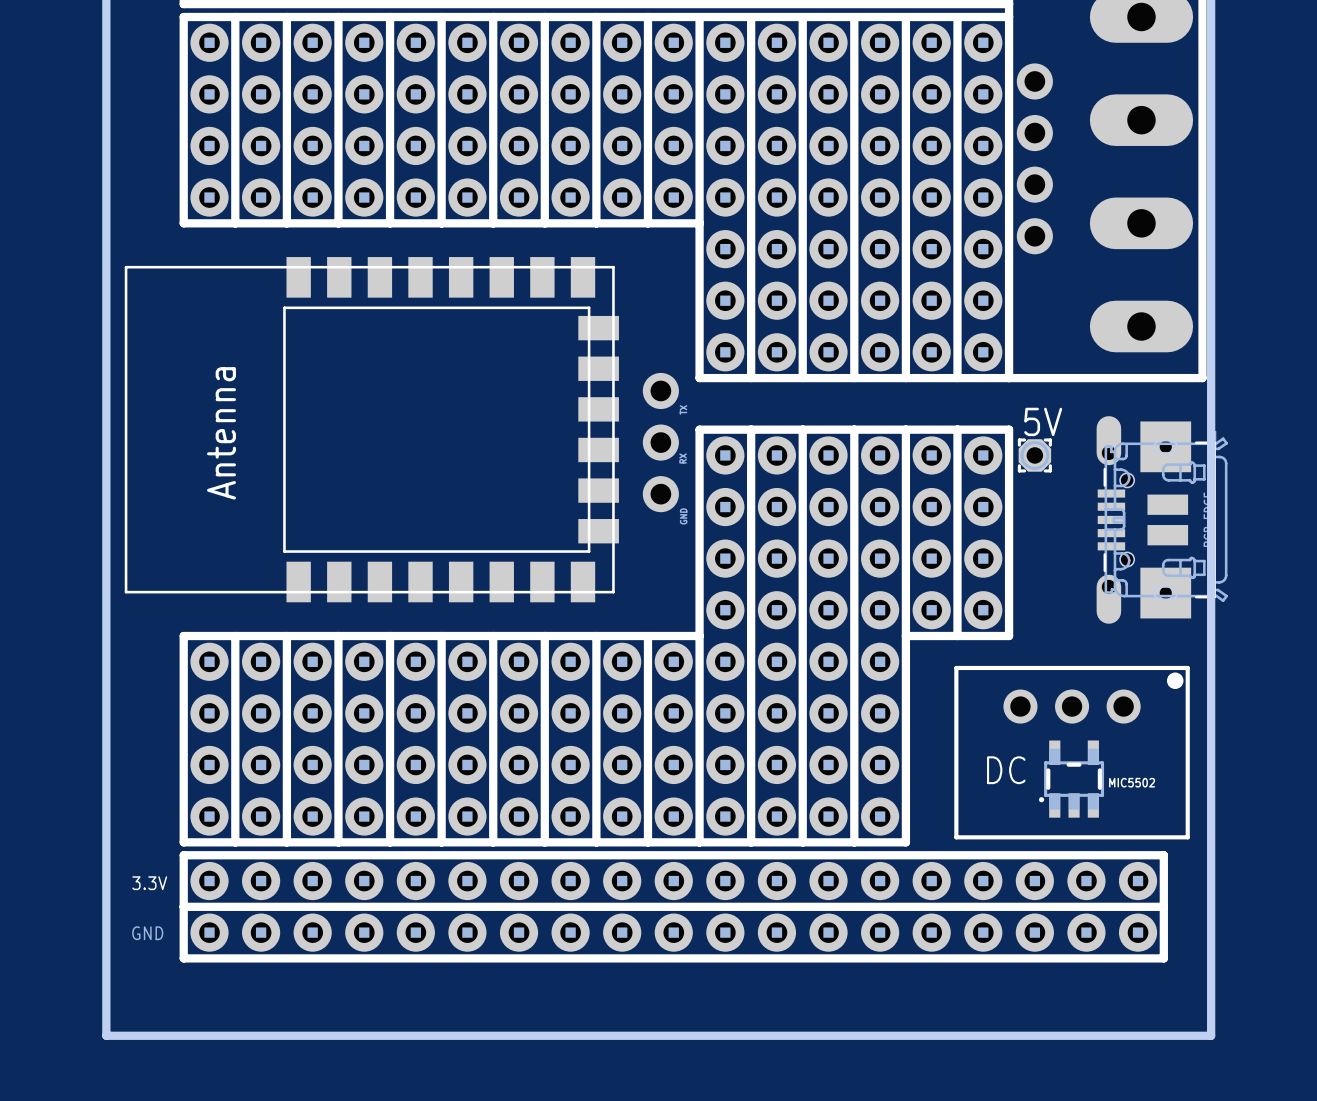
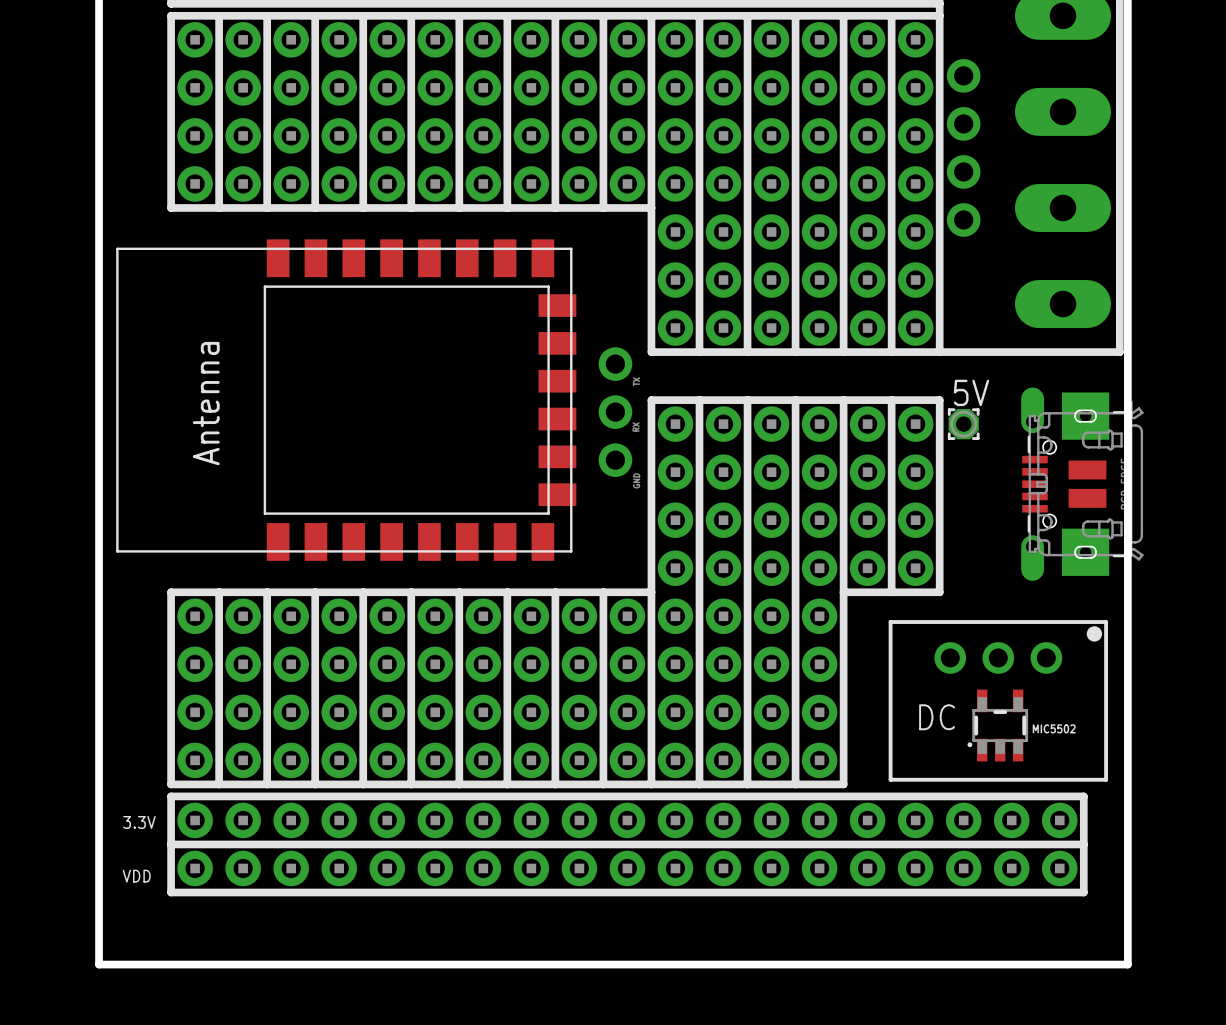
VDD value: GND (147, 933) -> none
VDD name: none -> VDD (136, 876)

